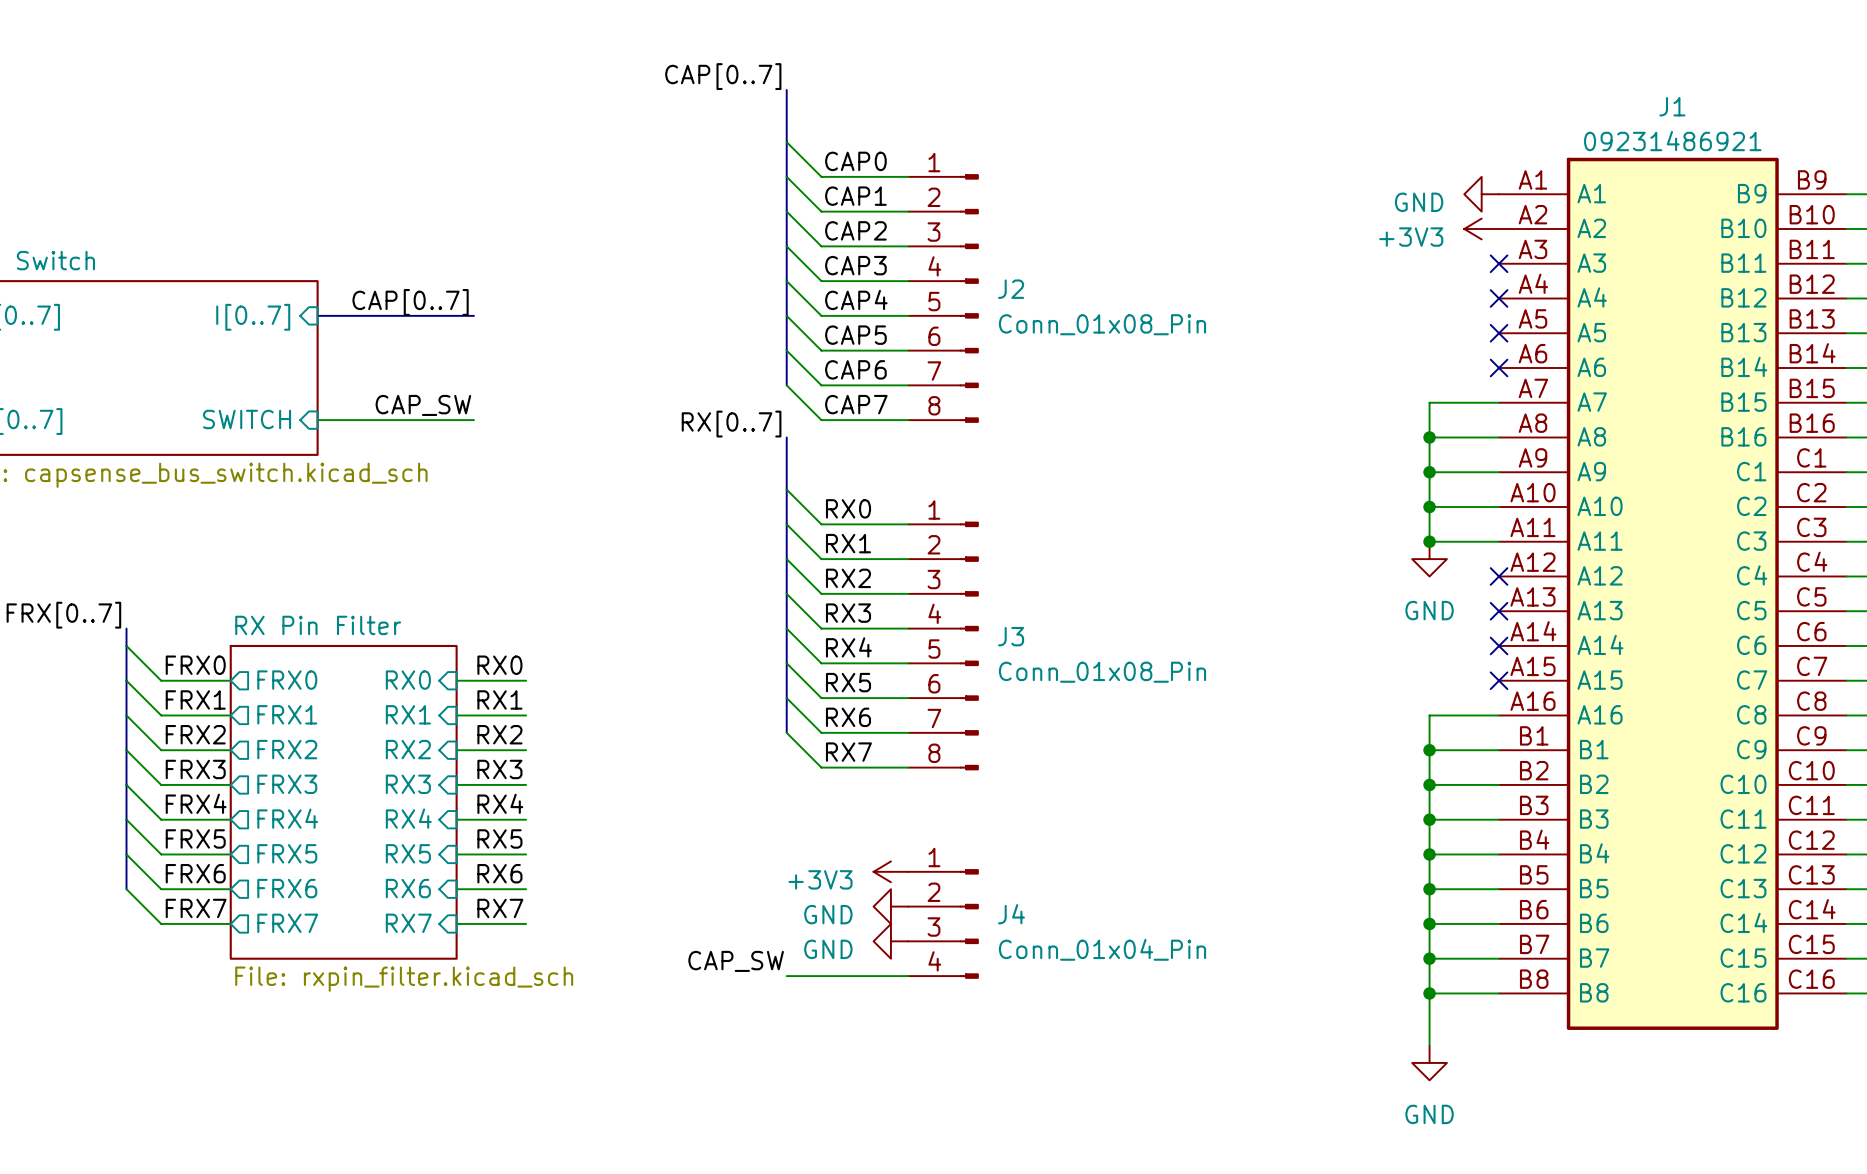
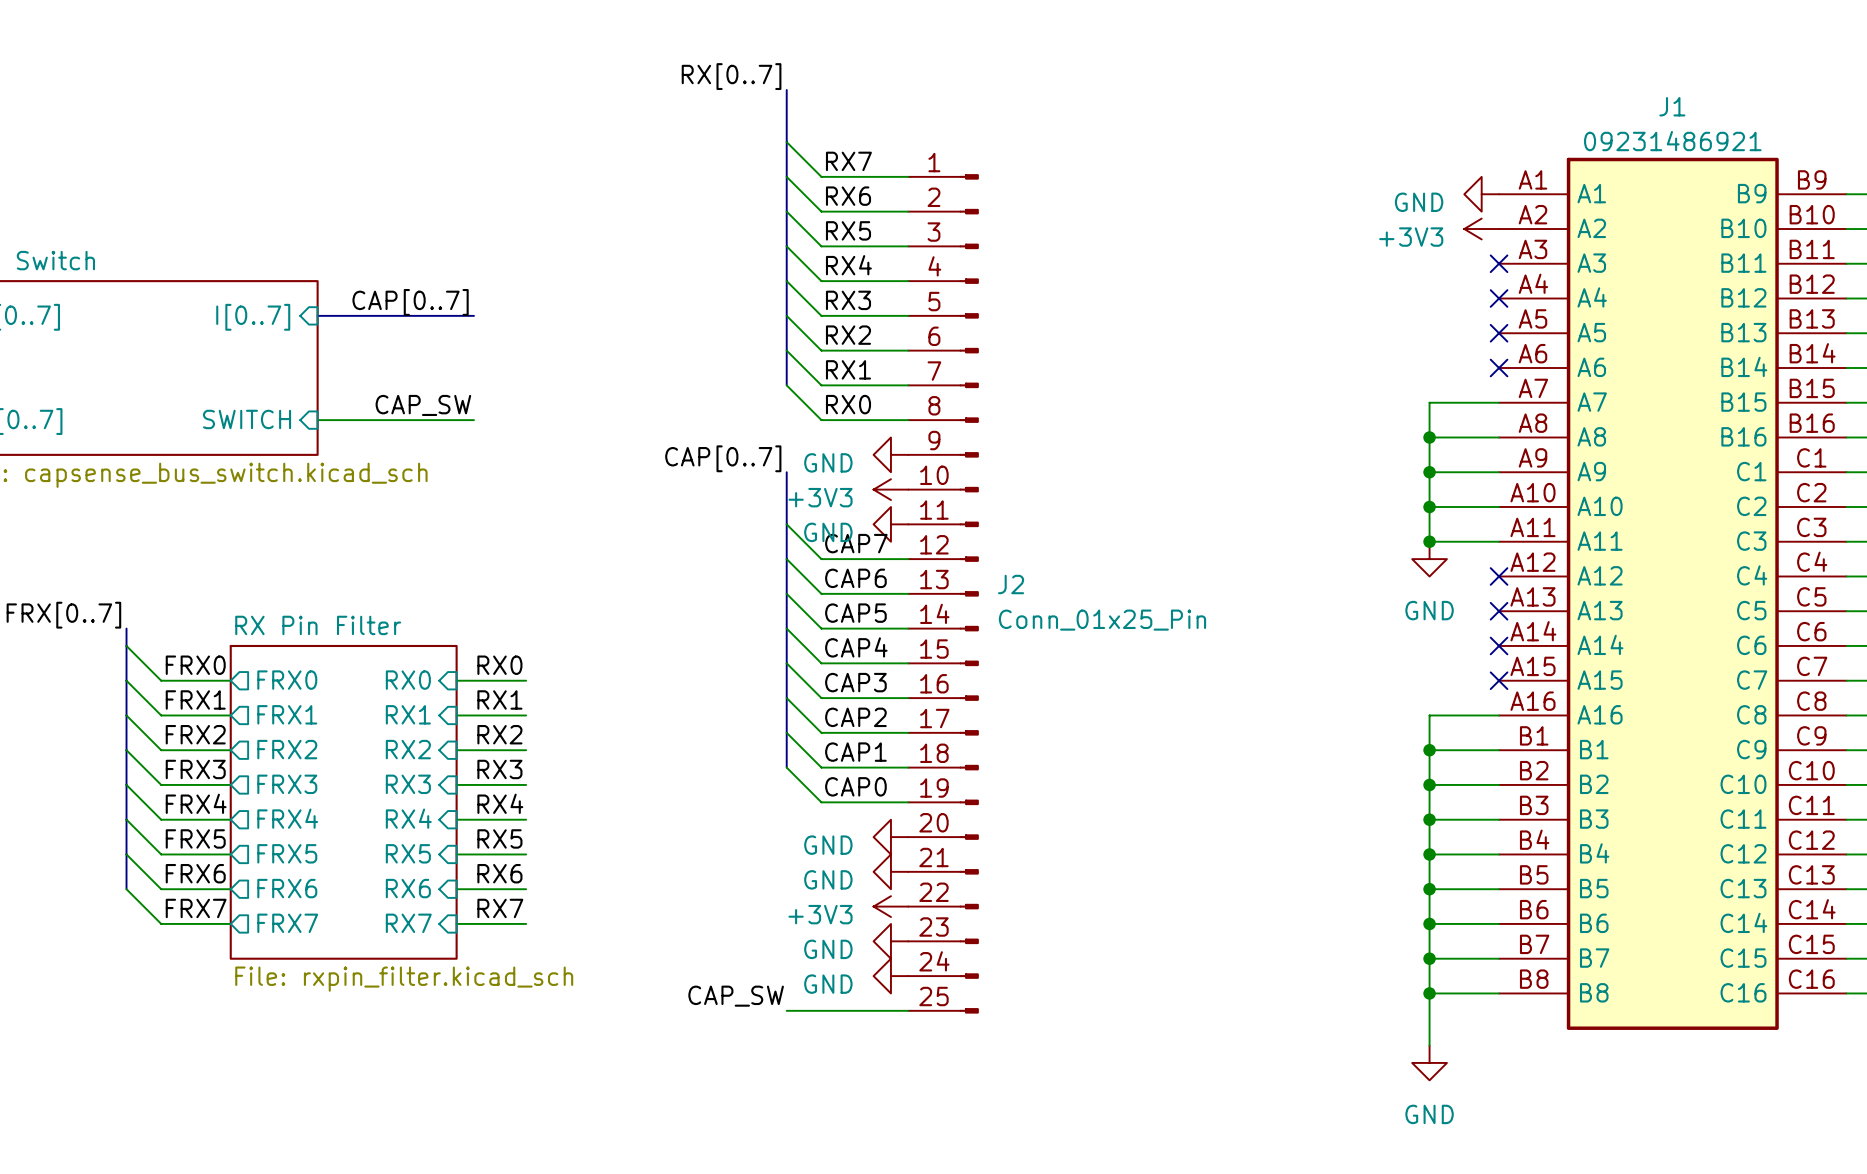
label: CAP[0..7] (723, 76) -> RX[0..7] (731, 76)
label: CAP0 (855, 161) -> RX7 (848, 161)
J2 symbol: [908, 174, 979, 423] -> [908, 174, 979, 1014]
label: CAP1 (855, 196) -> RX6 (848, 196)
label: CAP2 (855, 230) -> RX5 (848, 230)
label: CAP3 (855, 265) -> RX4 (848, 265)
label: CAP4 (856, 299) -> RX3 (848, 300)
J2 value: Conn_01x08_Pin (1102, 324) -> Conn_01x25_Pin (1102, 620)
label: CAP5 (855, 335) -> RX2 (848, 335)
label: CAP6 (855, 369) -> RX1 (848, 369)
label: CAP7 (856, 404) -> RX0 (848, 404)
label: RX[0..7] (731, 424) -> CAP[0..7] (723, 458)
bus: (786, 437) (786, 472) -> (786, 732) (786, 767)
power symbol: none -> GND (890, 454)
wire: (786, 489) (821, 524) (908, 524) -> (786, 767) (821, 802) (908, 802)
power symbol: none -> +3V3 (890, 489)
label: RX0 (848, 508) -> none
power symbol: none -> GND (890, 524)
label: RX1 (848, 543) -> CAP7 (856, 543)
label: RX2 (848, 578) -> CAP6 (855, 578)
label: RX3 (848, 613) -> CAP5 (855, 613)
J3: Conn_01x08_Pin (943, 645) -> none
label: RX4 (848, 647) -> CAP4 (856, 647)
label: RX5 (848, 682) -> CAP3 (855, 682)
label: RX6 (848, 717) -> CAP2 (855, 717)
label: RX7 (848, 752) -> CAP1 (855, 752)
label: none -> CAP0 (855, 786)
power symbol: none -> GND (890, 837)
power symbol: +3V3 (890, 871) -> GND (890, 871)
power symbol: GND (890, 906) -> +3V3 (890, 906)
J4: Conn_01x04_Pin (943, 923) -> none
label position: CAP_SW (736, 961) -> CAP_SW (736, 996)
wire: (786, 976) (908, 976) -> (786, 1010) (908, 1010)
power symbol: none -> GND (890, 976)

